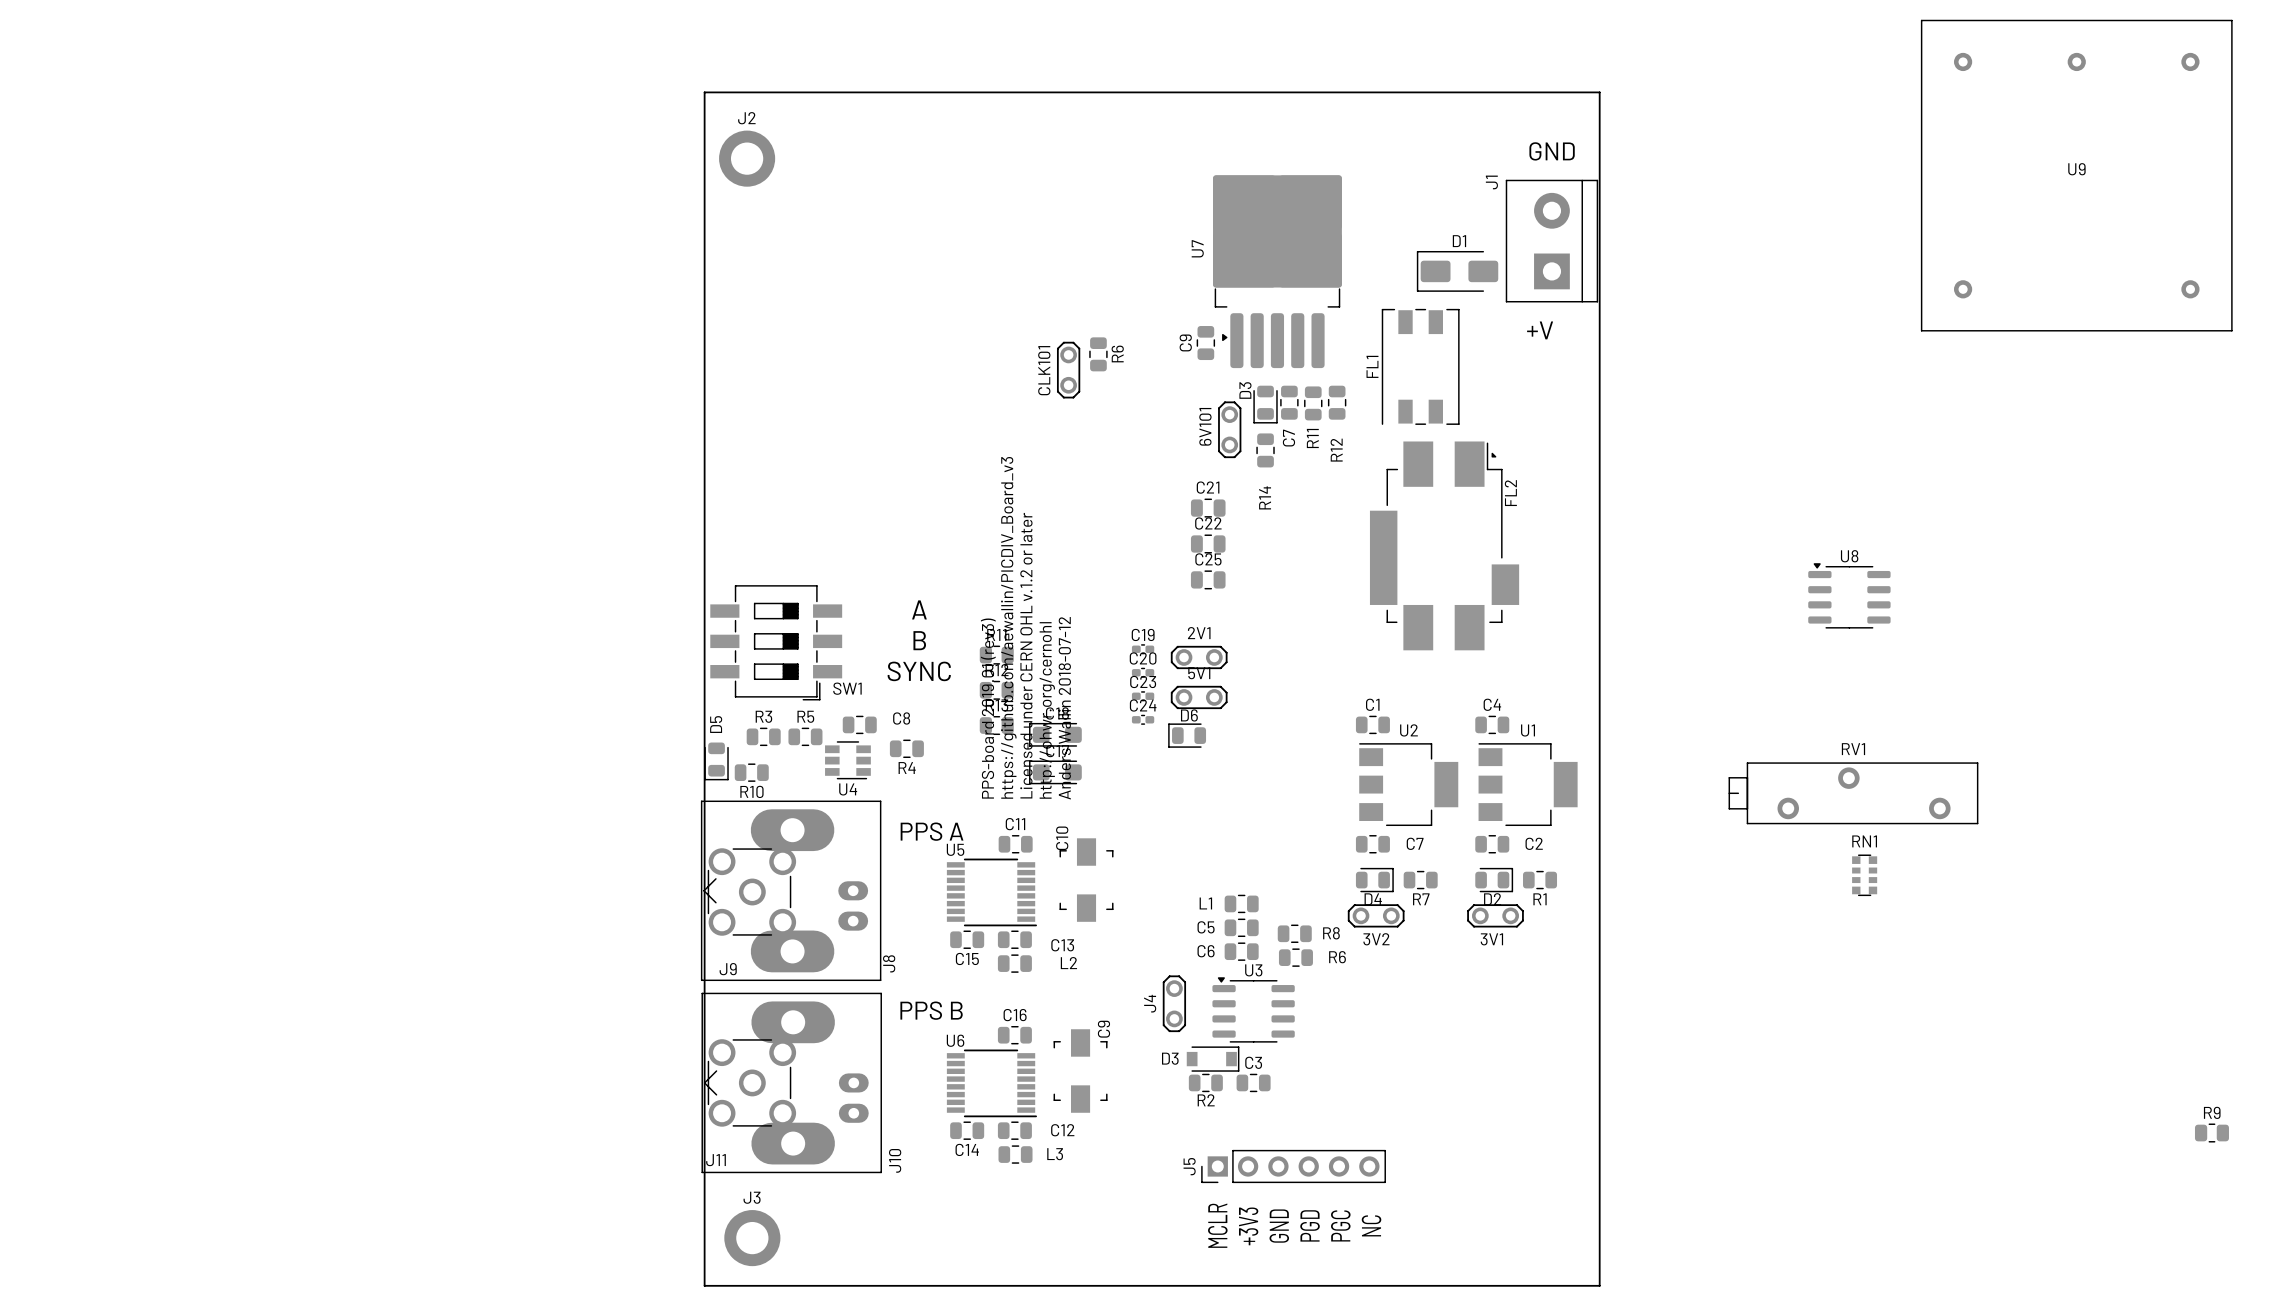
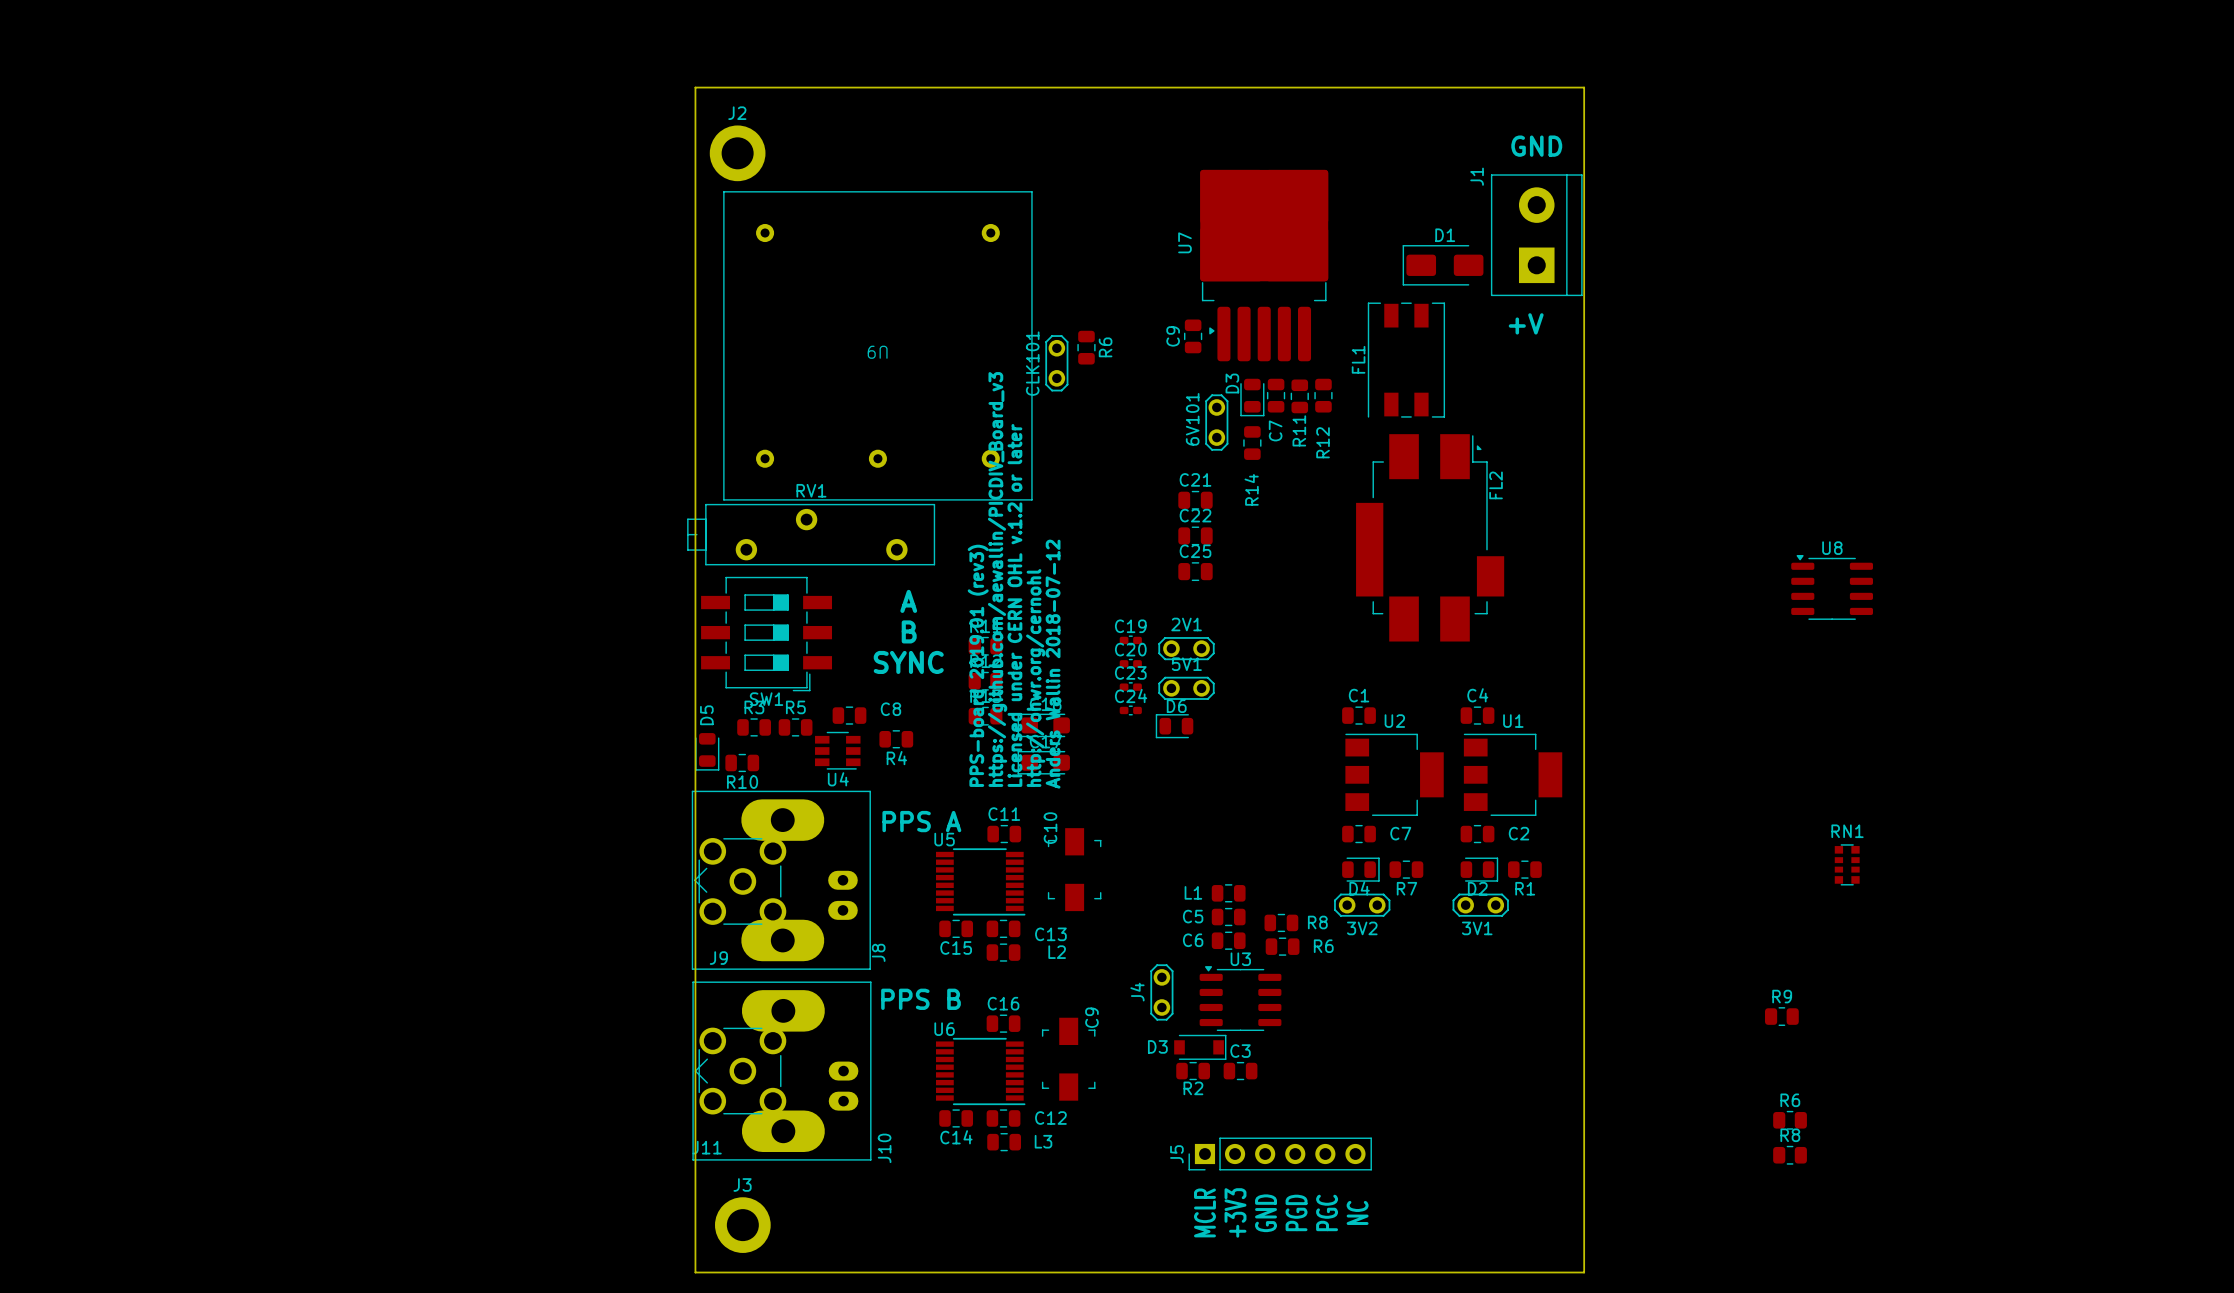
U9 rotation: 0° (2076, 175) -> 180° (877, 345)
U9 position: (2076, 175) -> (877, 345)
SW1 name position: SW1 (847, 688) -> SW1 (766, 699)
RV1 position: (1853, 793) -> (811, 534)
R6: none -> (1790, 1120)
R9 position: (2211, 1133) -> (1781, 1016)
R8: none -> (1790, 1155)

